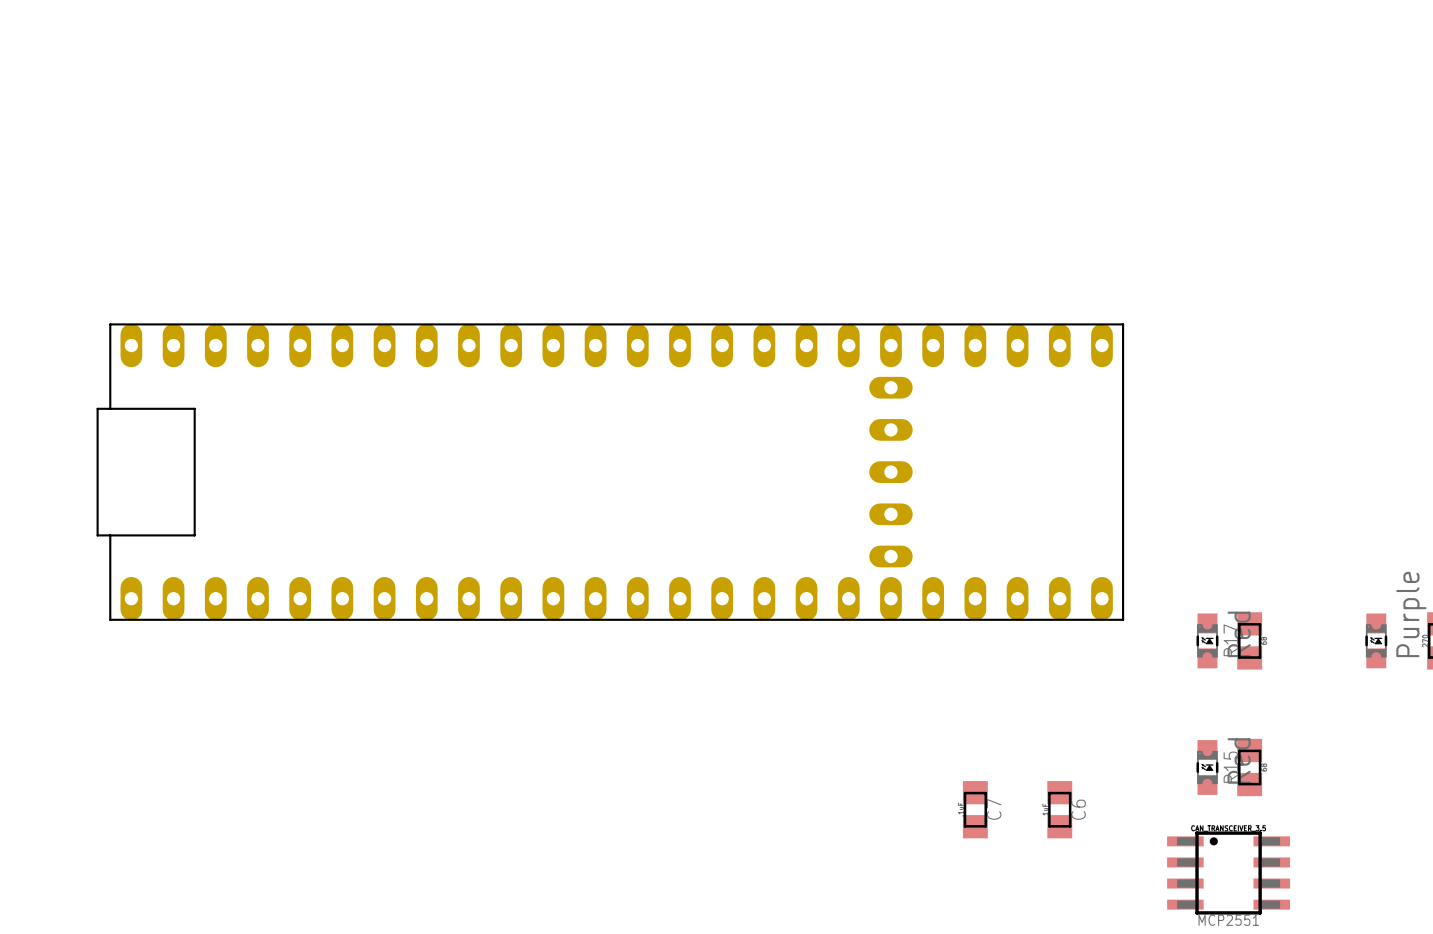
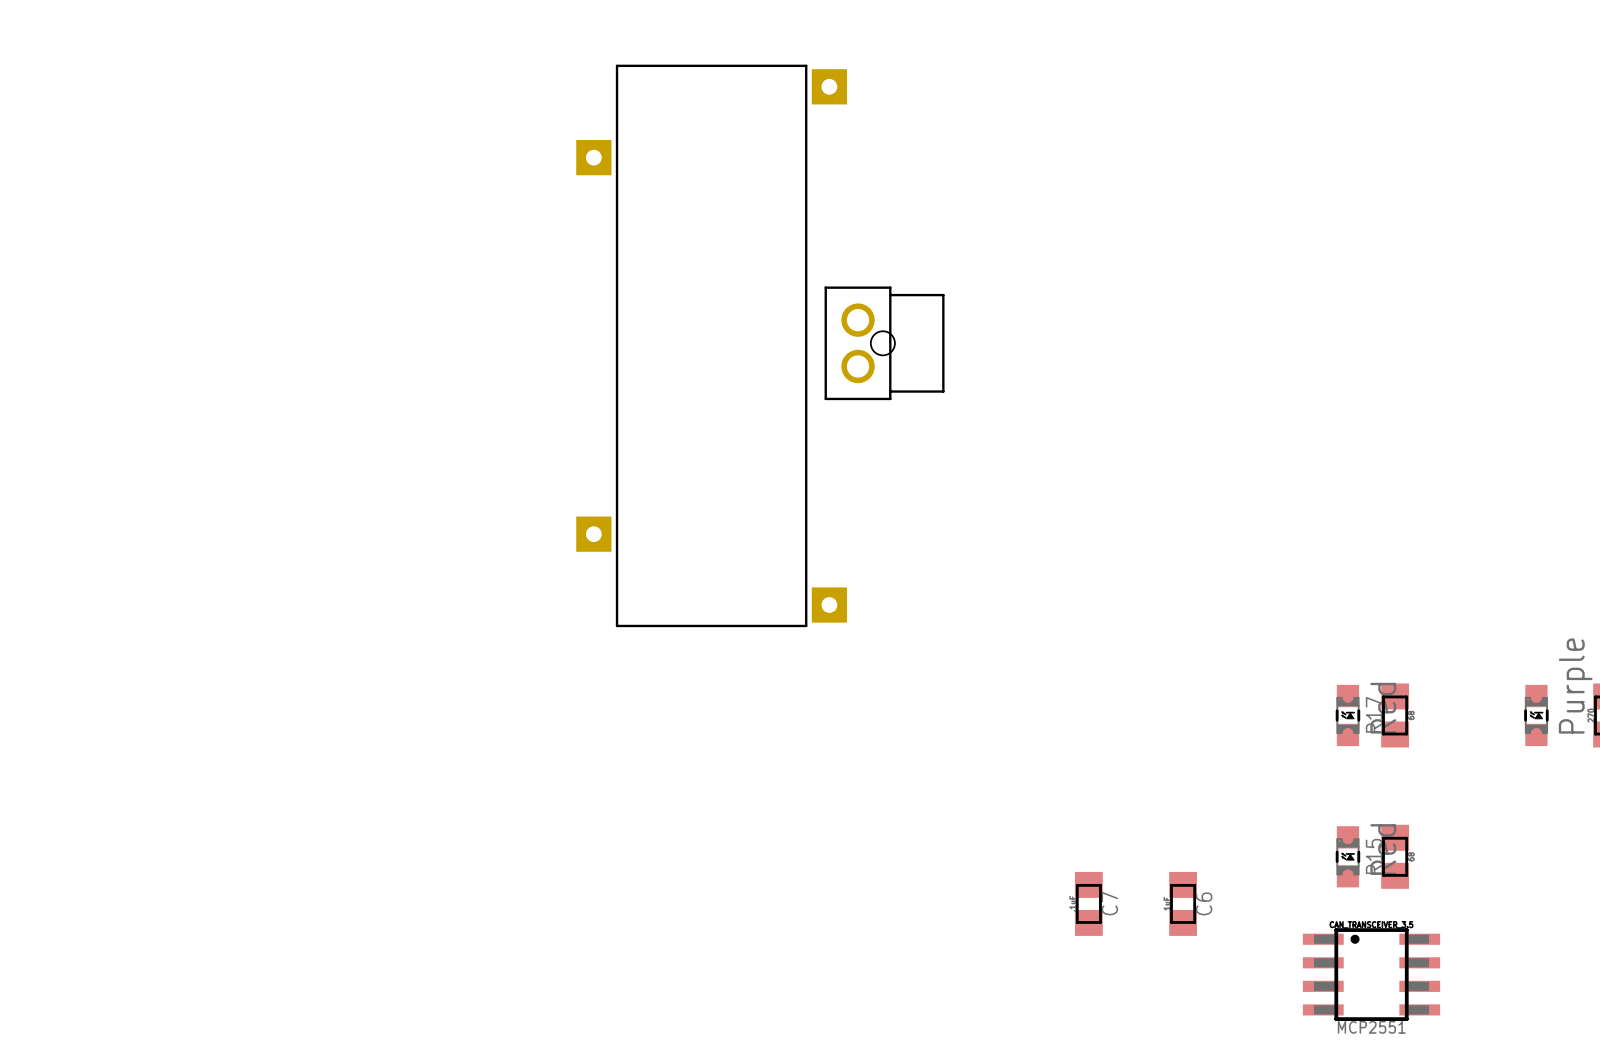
part: none -> (884, 343)
part: none -> (711, 345)
part: (610, 472) -> none

